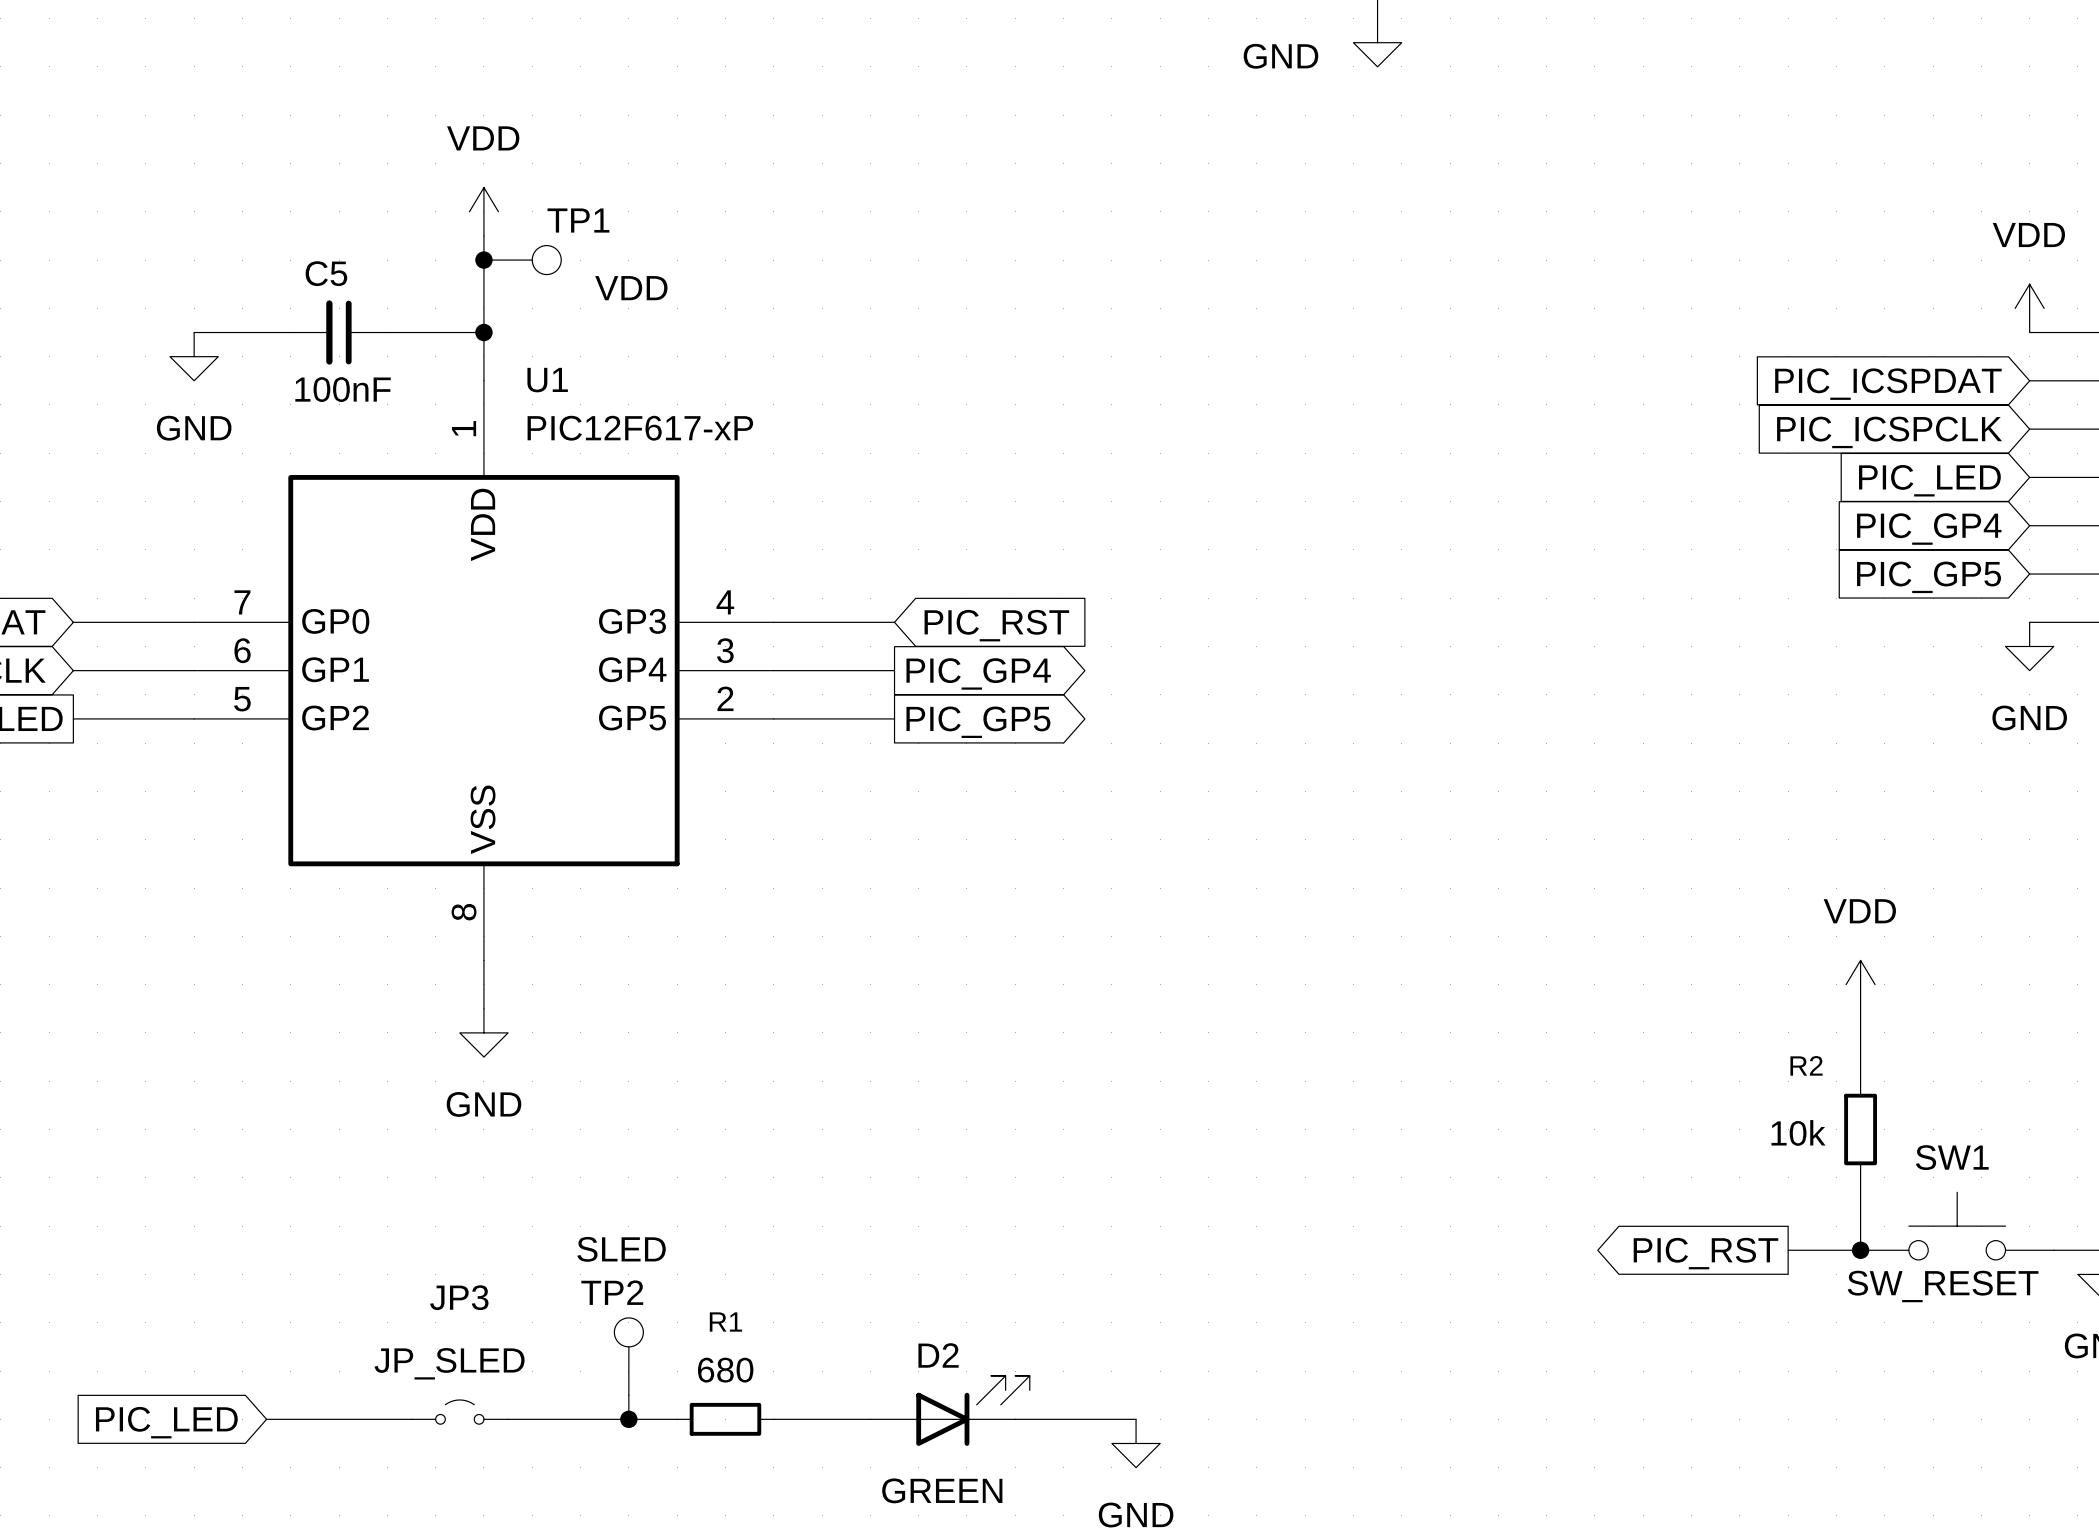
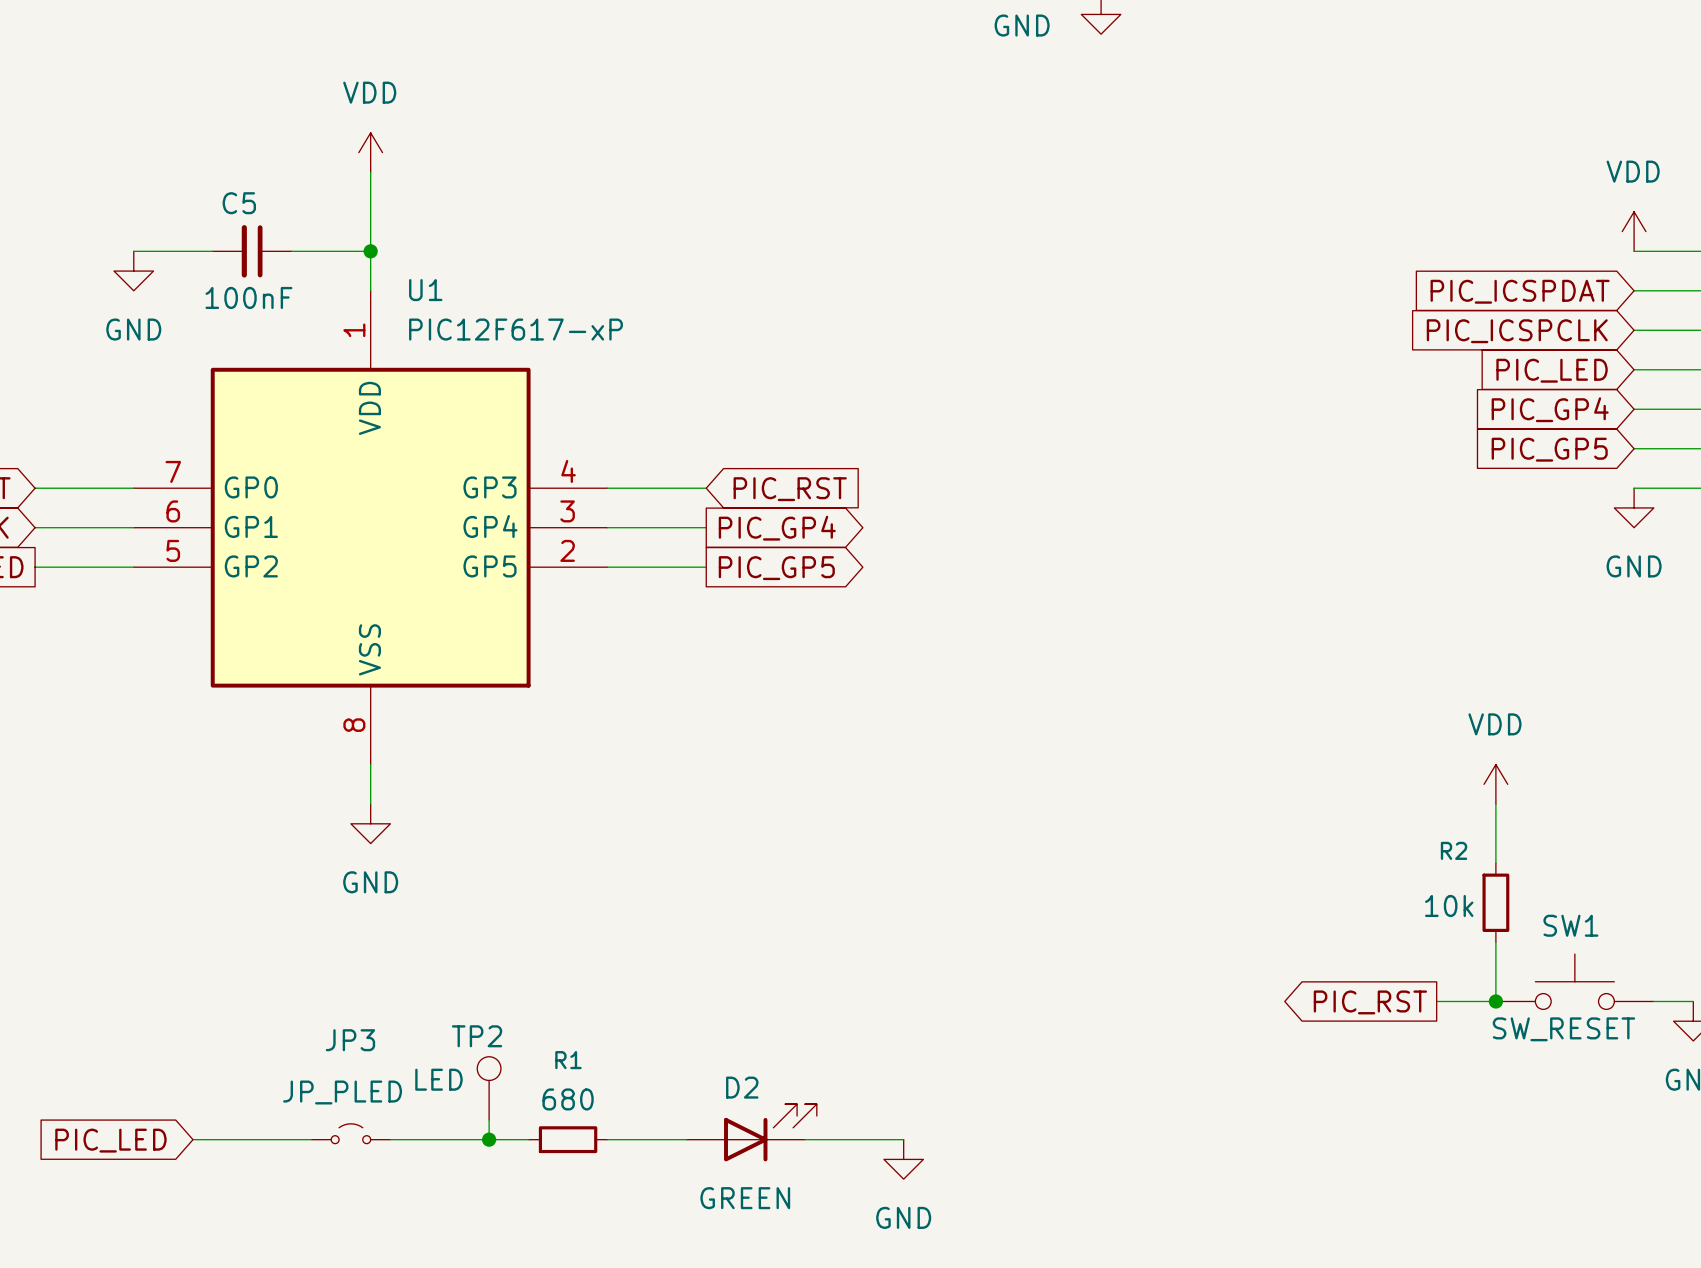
junction: (483, 260) -> none
TP1: VDD (522, 260) -> none
TP2 value: SLED (621, 1249) -> LED (438, 1079)
JP3 value: JP_SLED (449, 1363) -> JP_PLED (342, 1092)

